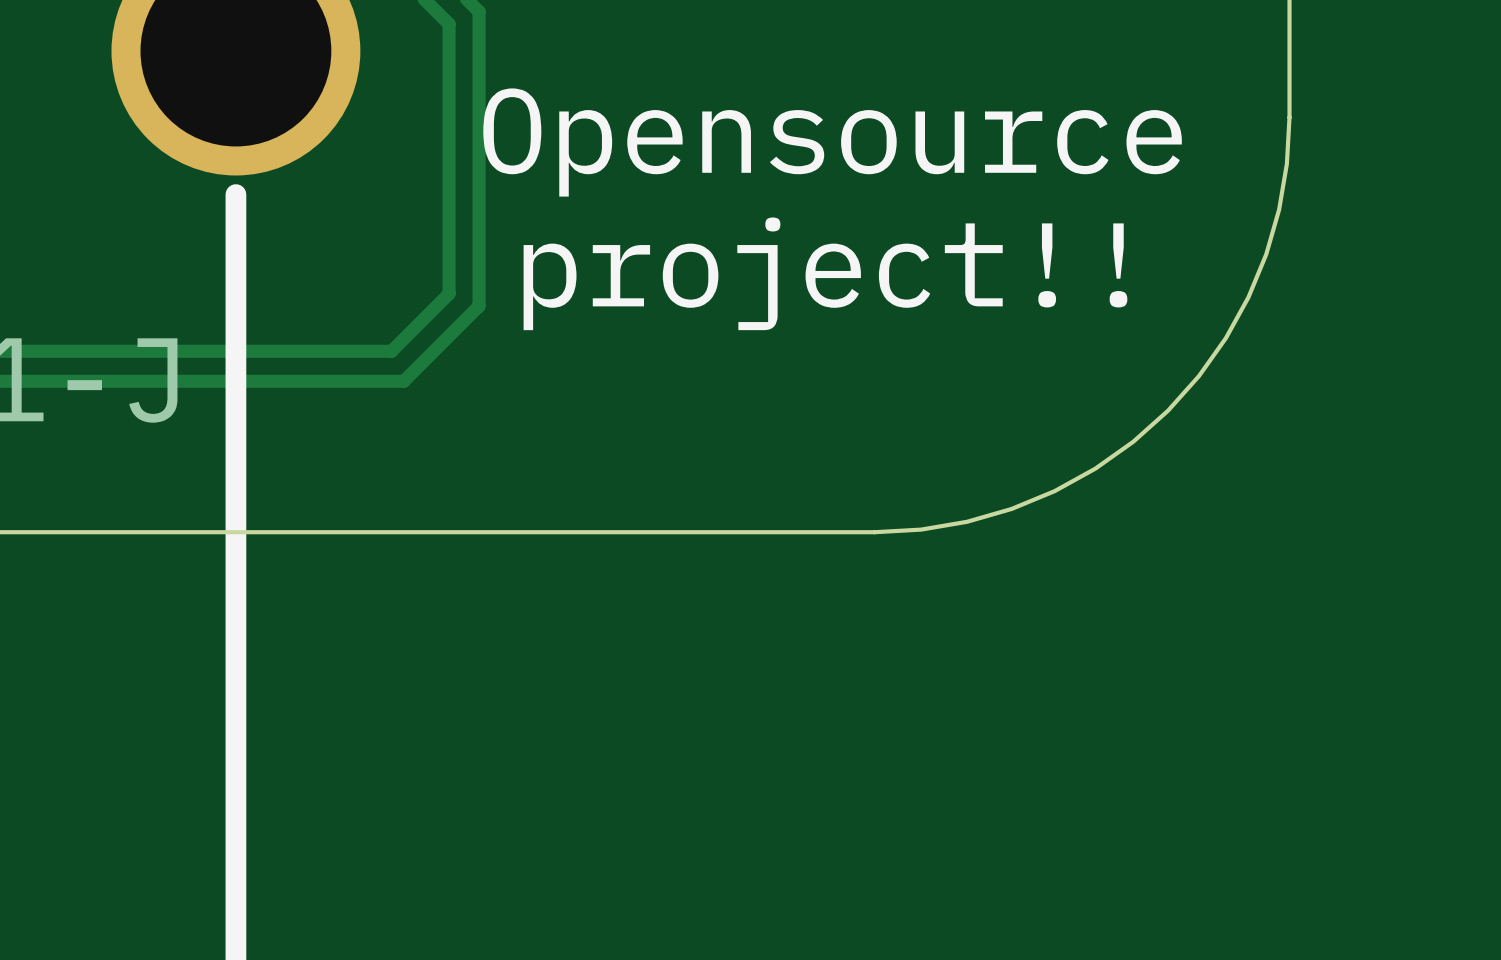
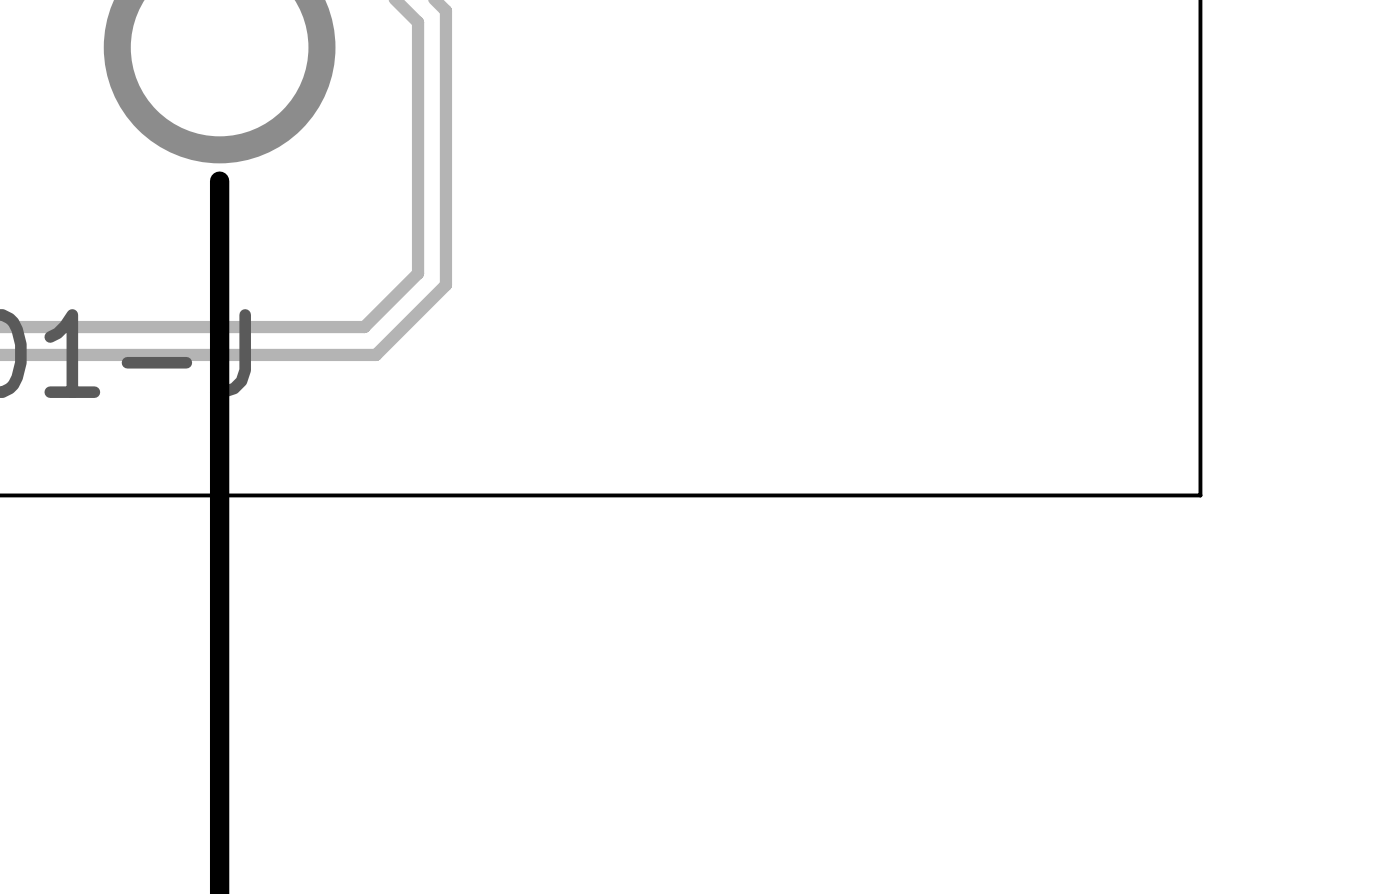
board edge: (1289, 117) (1286, 163) (1279, 209) (1266, 254) (1248, 297) (1225, 338) (1199, 376) (1168, 410) (1133, 441) (1095, 468) (1054, 491) (1011, 508) (967, 521) (921, 529) (874, 532) -> (1200, 109) (1200, 495) (814, 495)
text: Opensource (832, 142) -> none
text: project!! (825, 273) -> none

